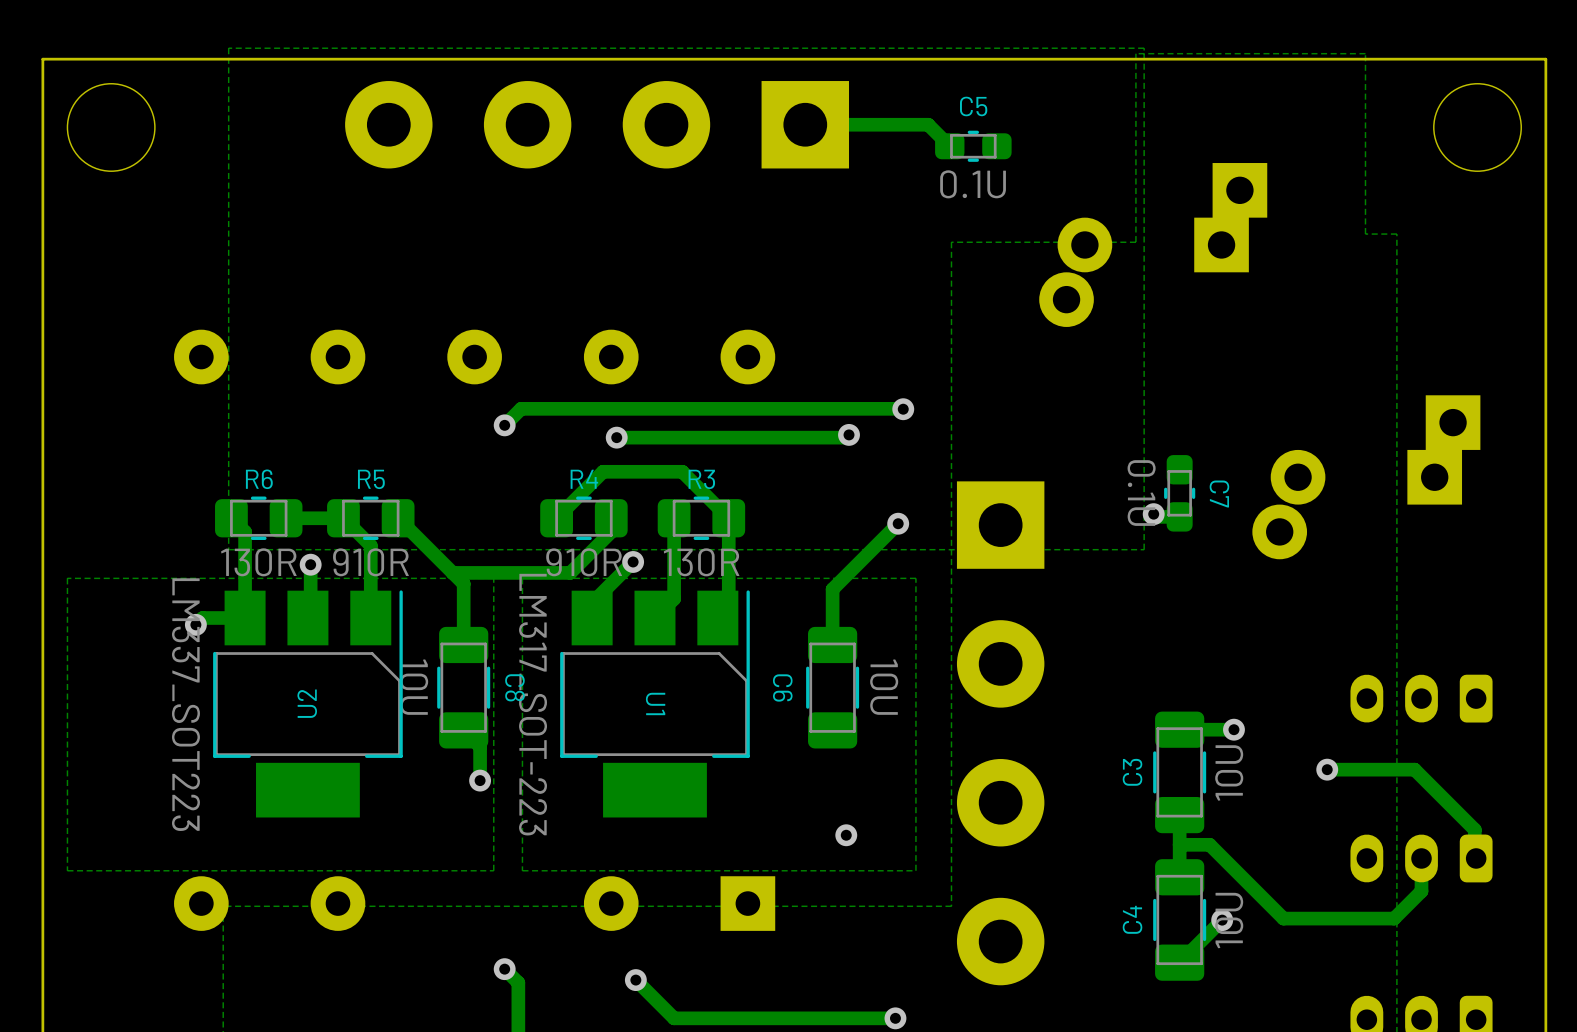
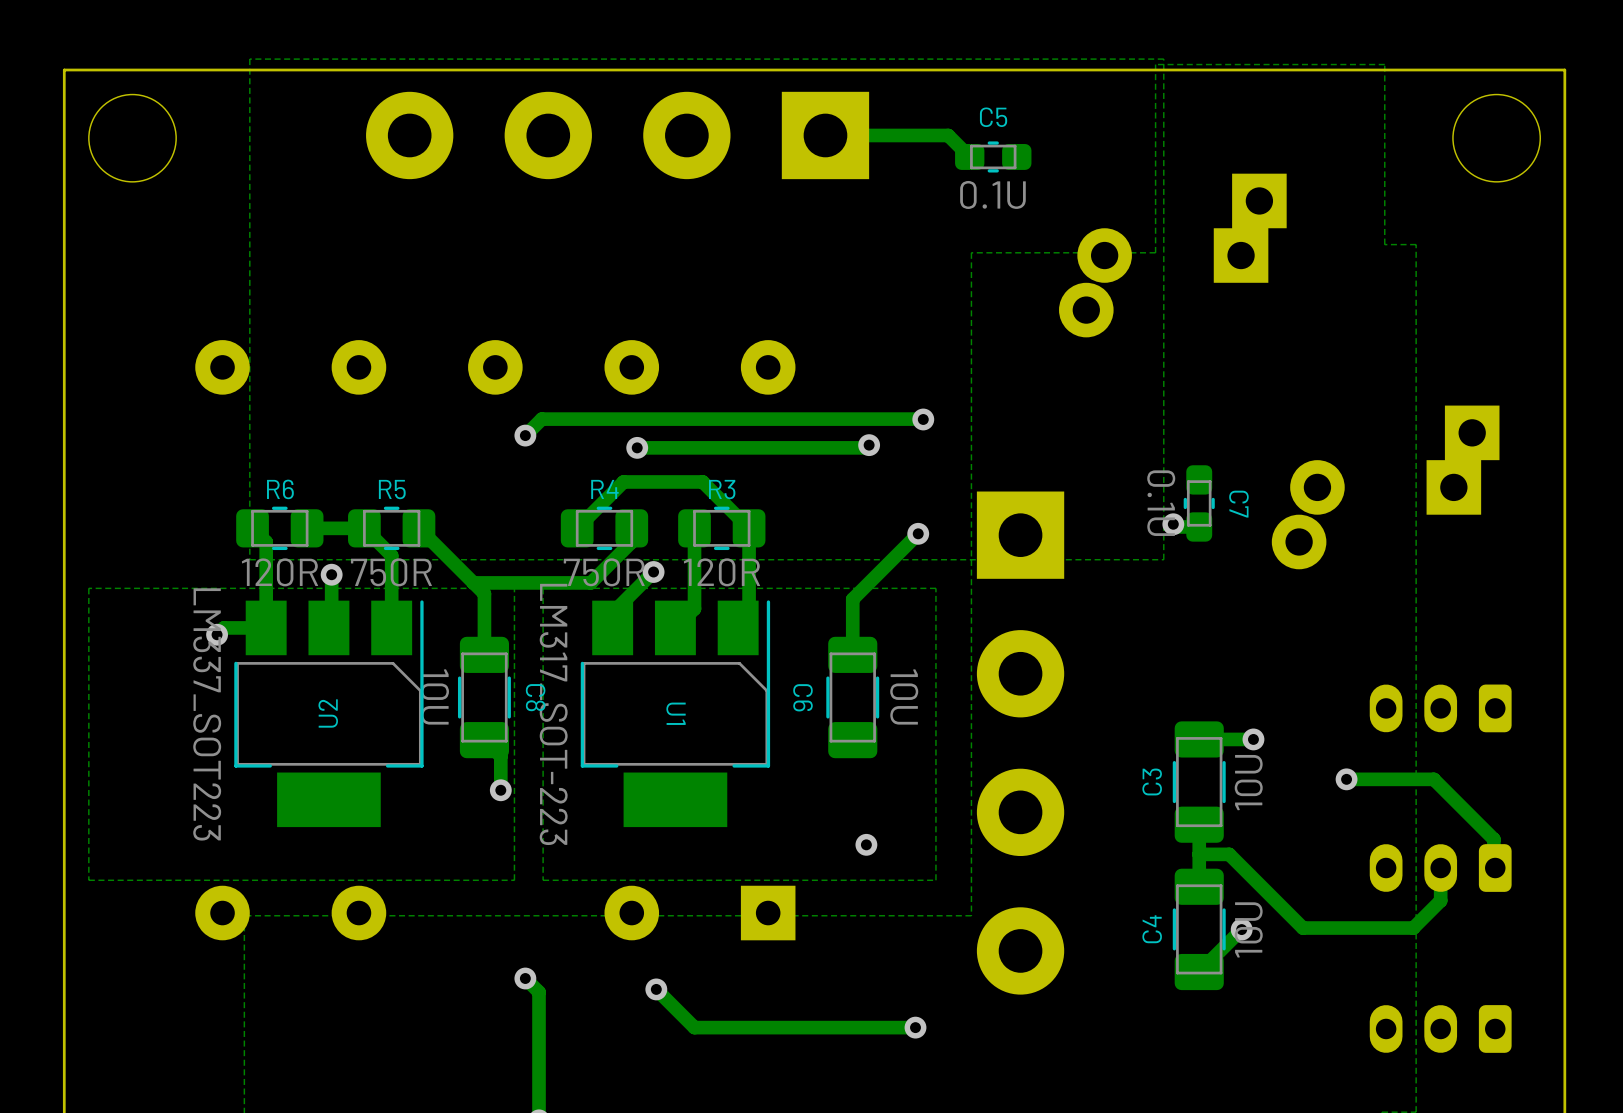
R6 value: 130R (258, 562) -> 120R (280, 572)
R5 value: 910R (370, 562) -> 750R (391, 572)
R4 value: 910R (584, 562) -> 750R (604, 572)
R3 value: 130R (701, 562) -> 120R (721, 572)

